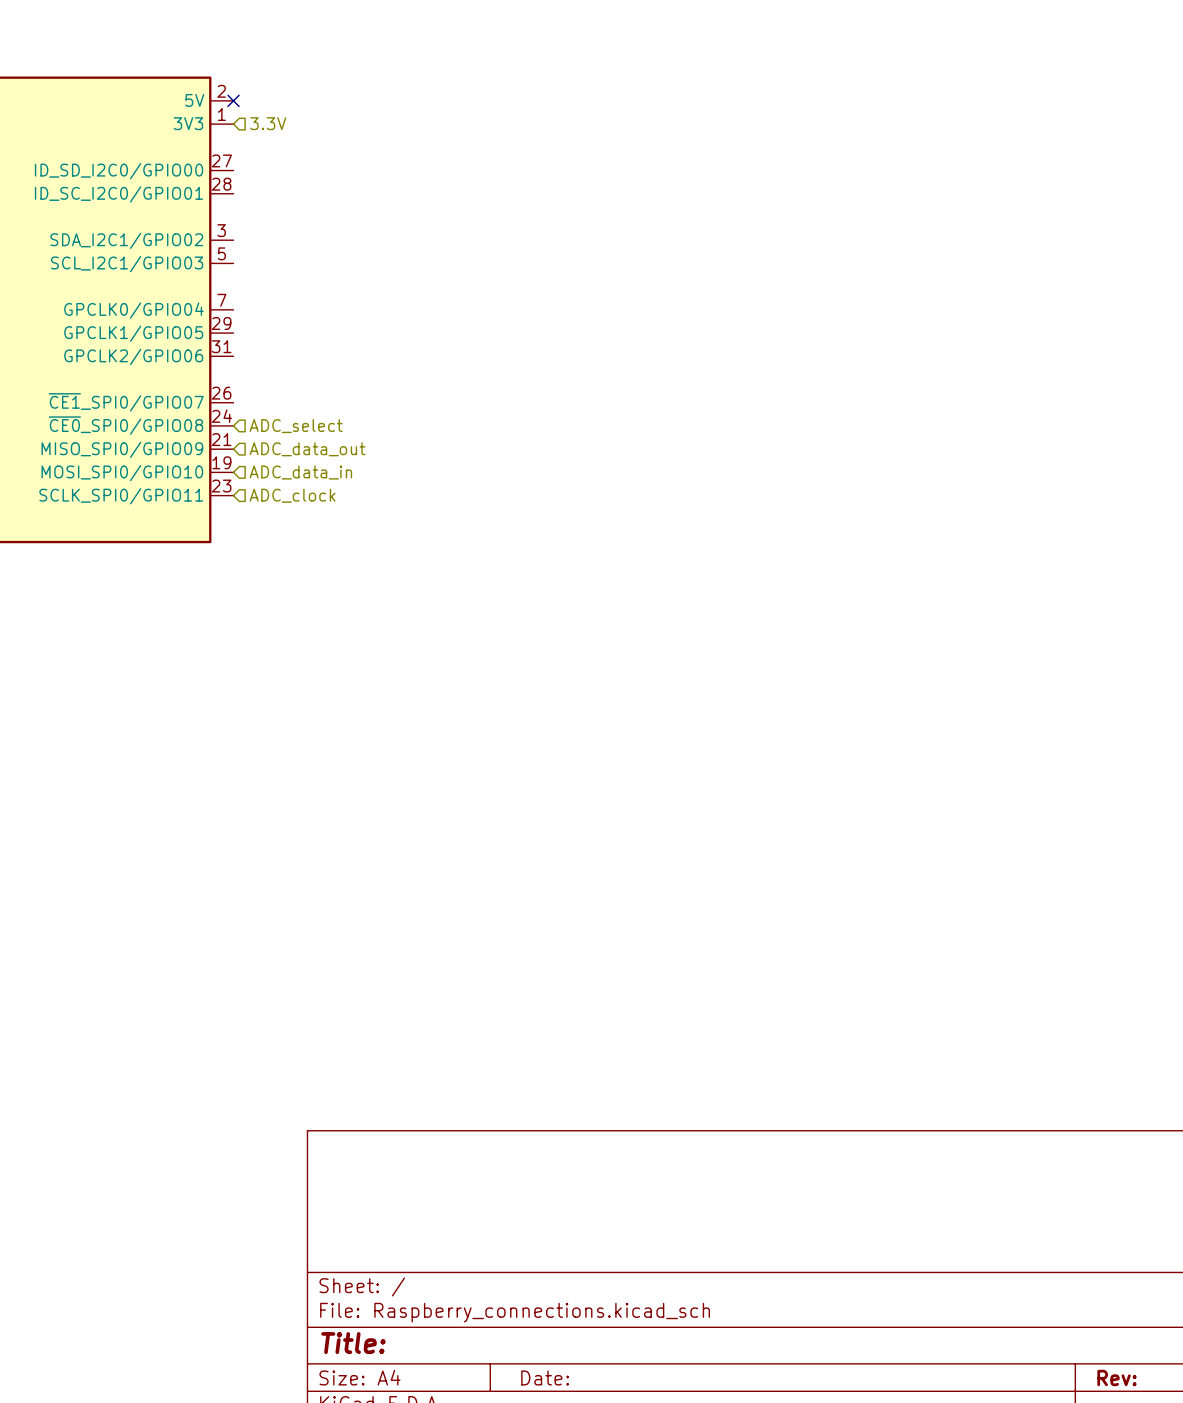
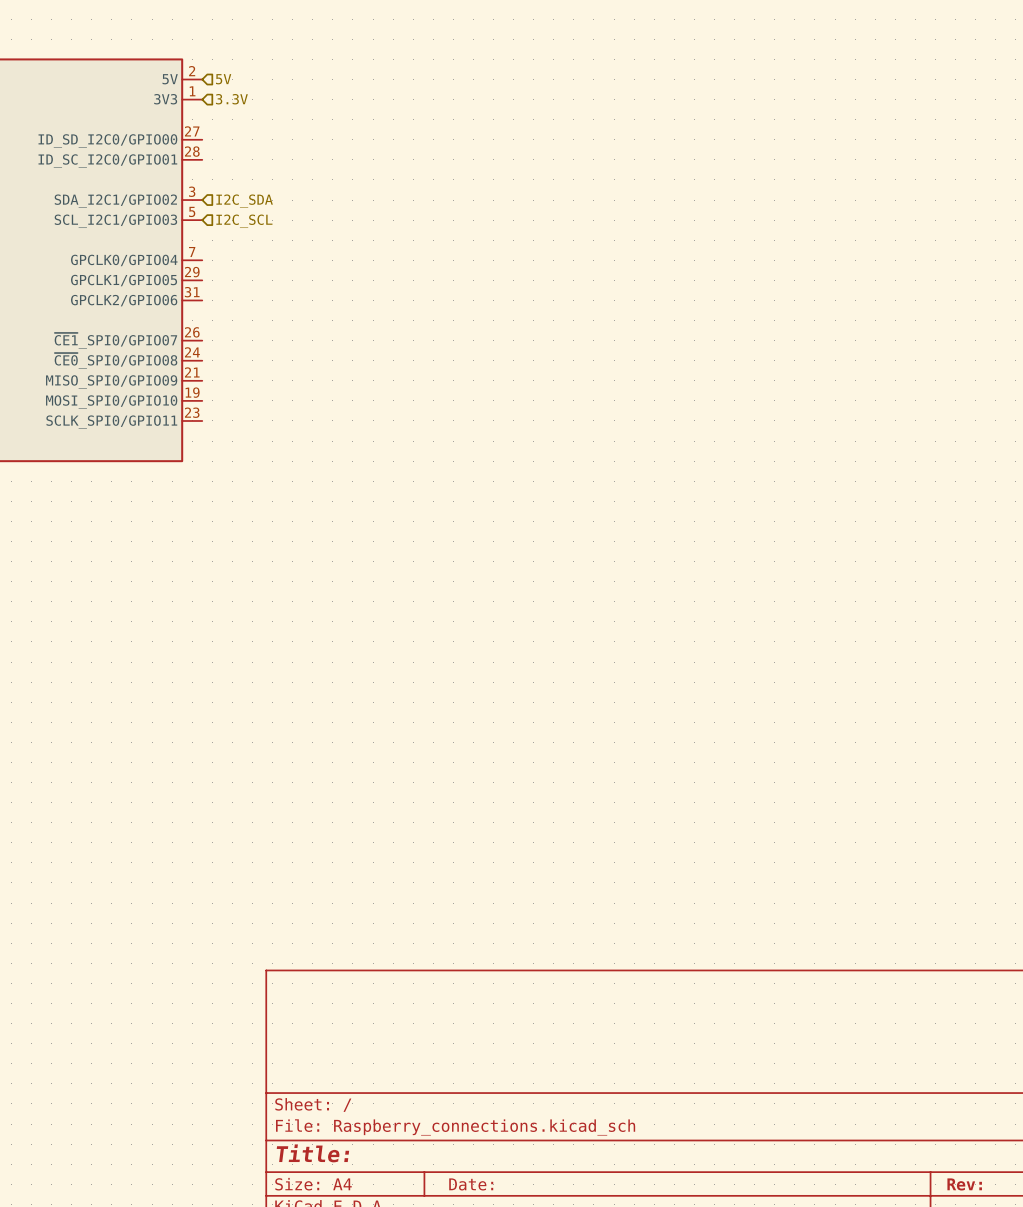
no-connect mark: (233, 100) -> none
hierarchical label: none -> 5V (223, 79)
hierarchical label: none -> I2C_SDA (244, 201)
hierarchical label: none -> I2C_SCL (244, 221)
hierarchical label: ADC_select (296, 426) -> none
hierarchical label: ADC_data_out (307, 449) -> none
hierarchical label: ADC_data_in (300, 472) -> none
hierarchical label: ADC_clock (292, 495) -> none

